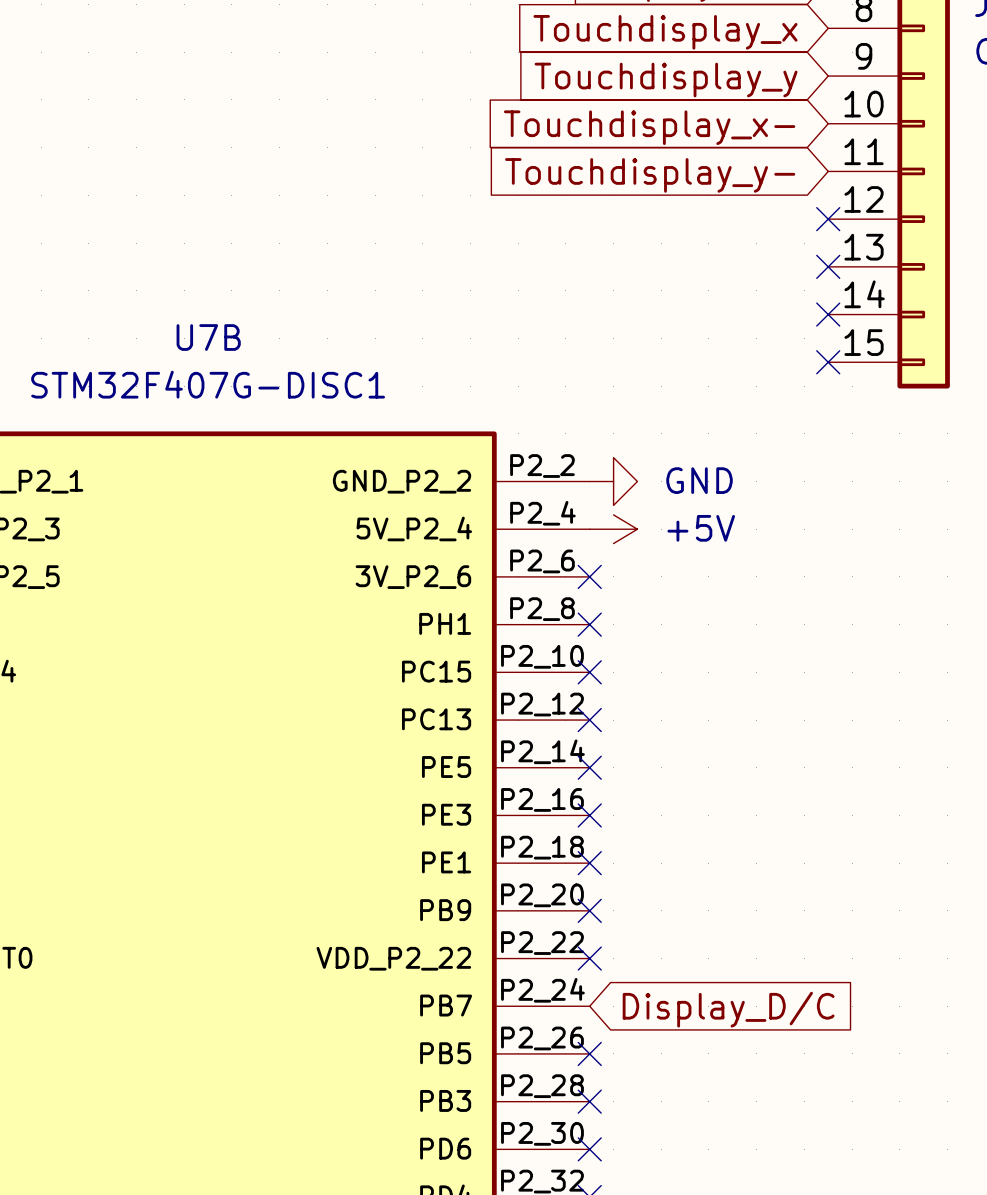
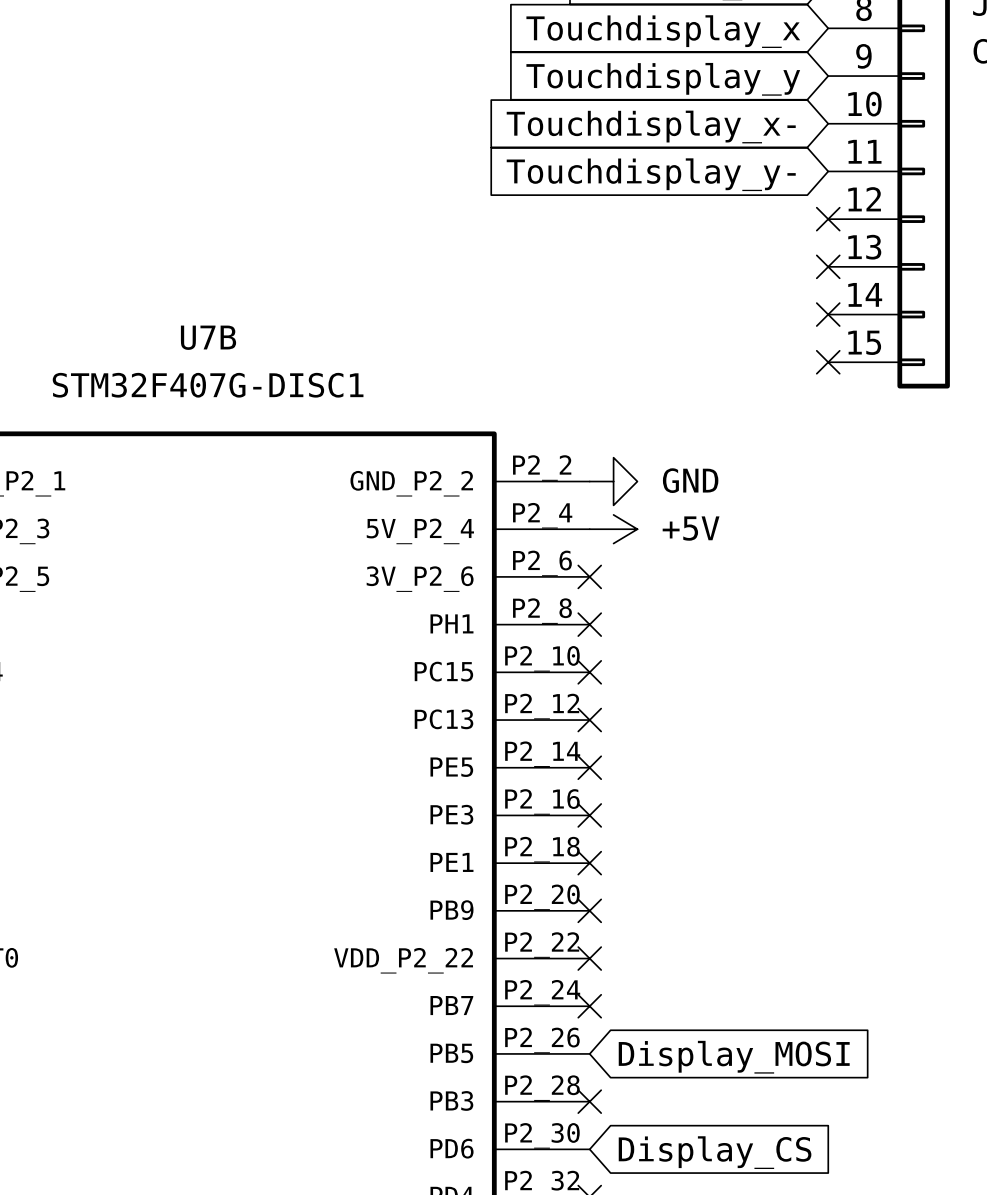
global label: Display_D/C (728, 1009) -> Display_MOSI (734, 1057)
no-connect mark position: (589, 1053) -> (589, 1006)
no-connect mark: (589, 1149) -> none
global label: none -> Display_CS (715, 1152)

